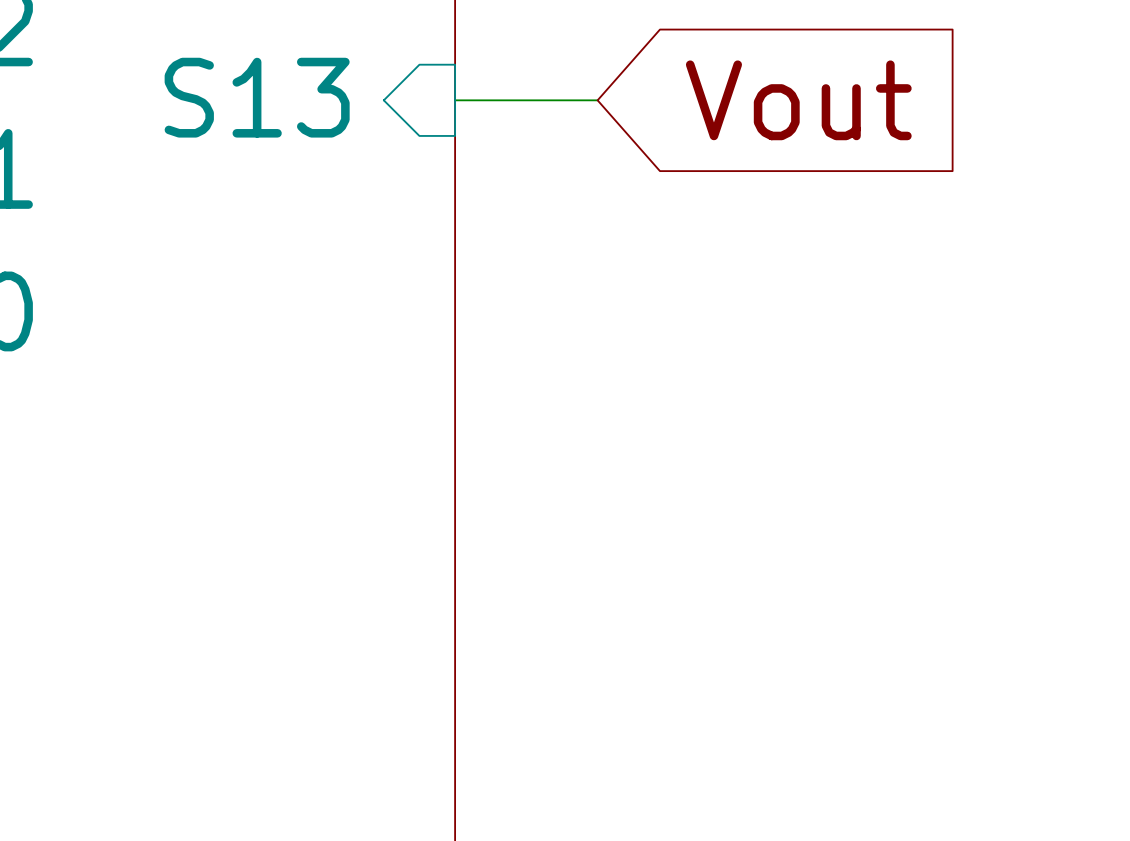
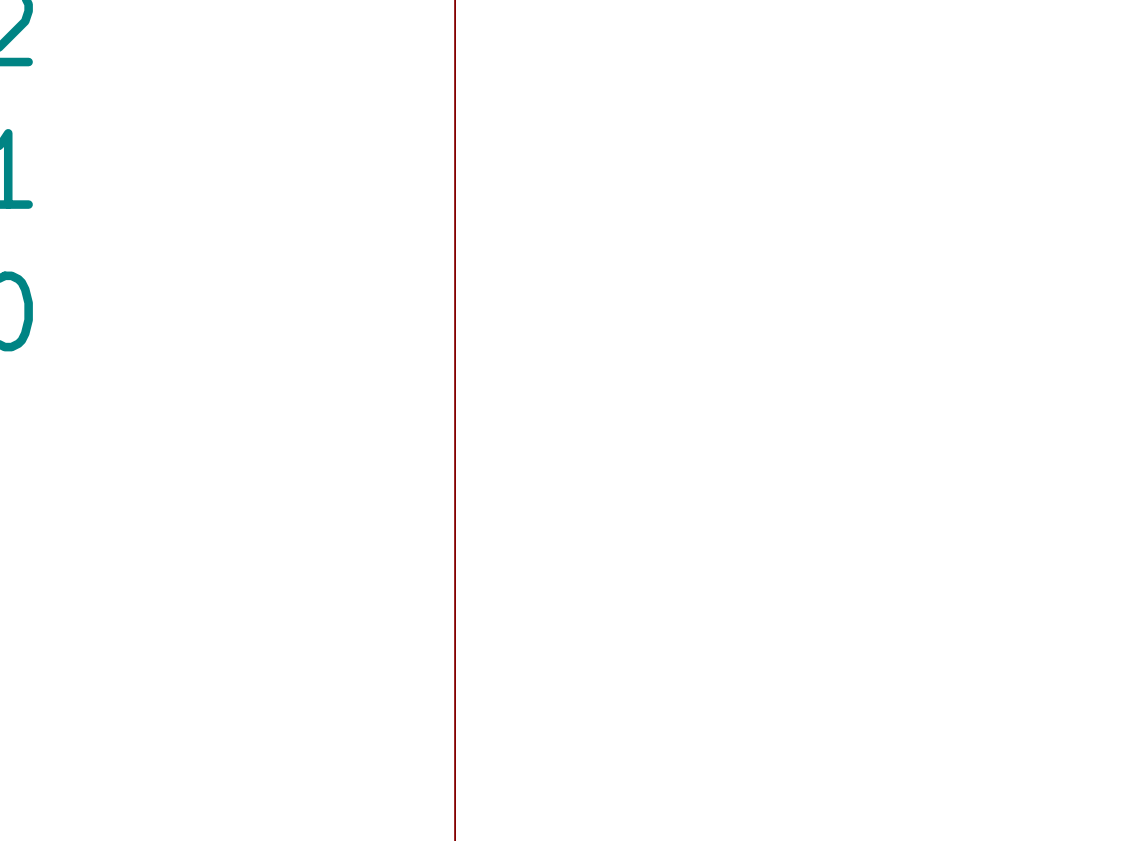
sheet pin: S13 (257, 97) -> none
wire: (455, 100) (597, 100) -> none
global label: Vout (798, 100) -> none

